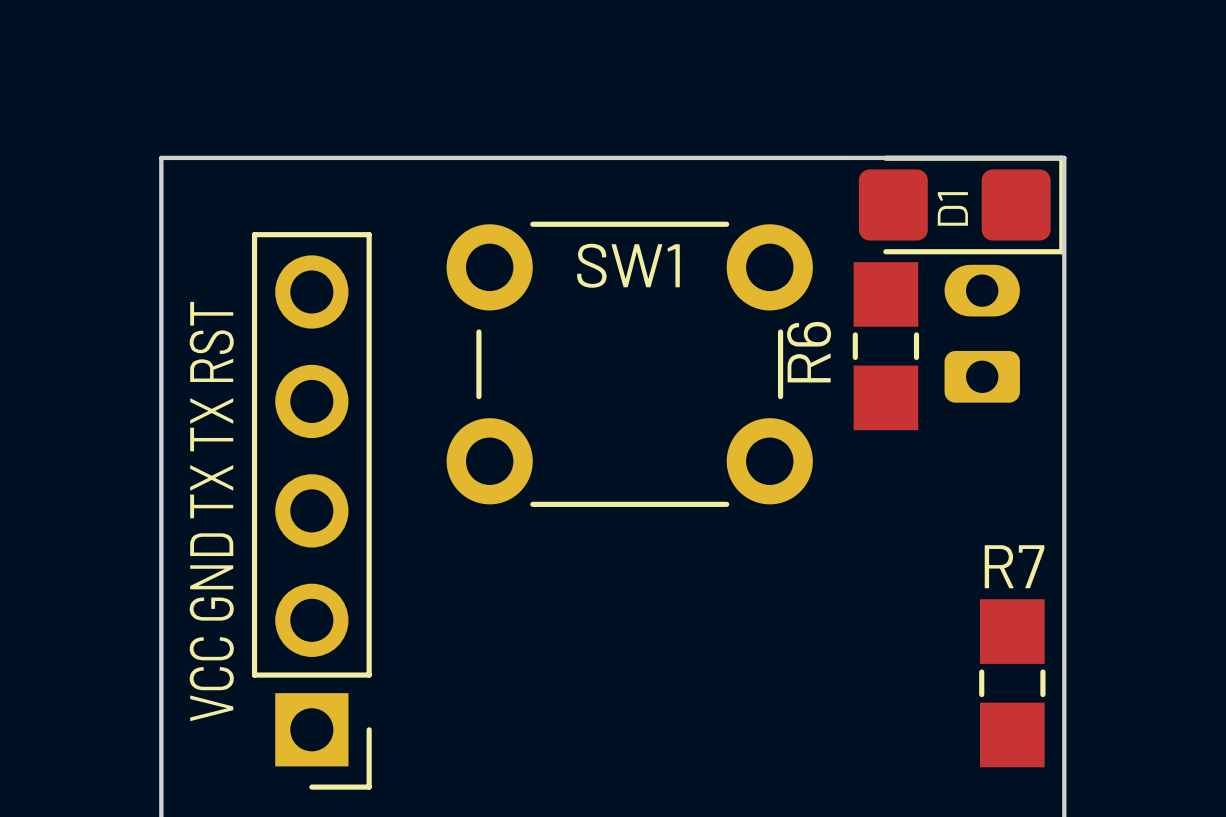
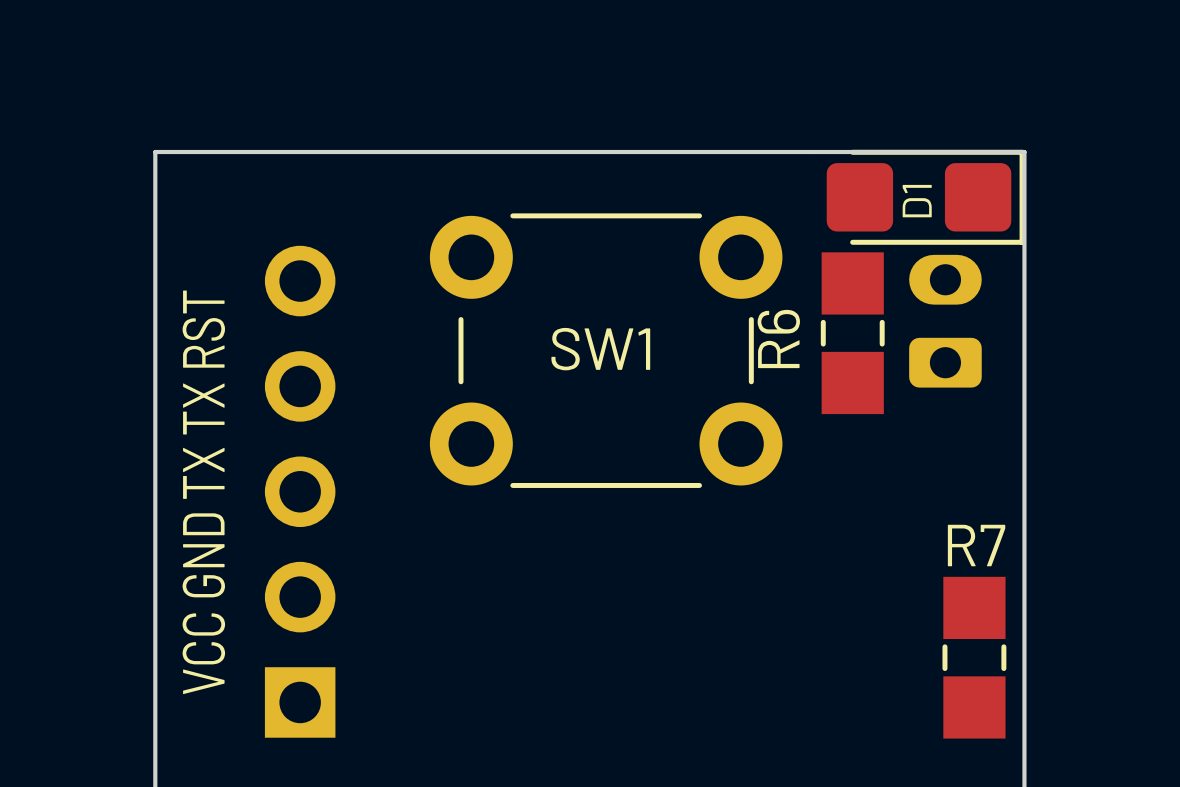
part footprint: [251, 232, 372, 790] -> [264, 245, 336, 738]
SW1 name position: SW1 (628, 265) -> SW1 (600, 349)

